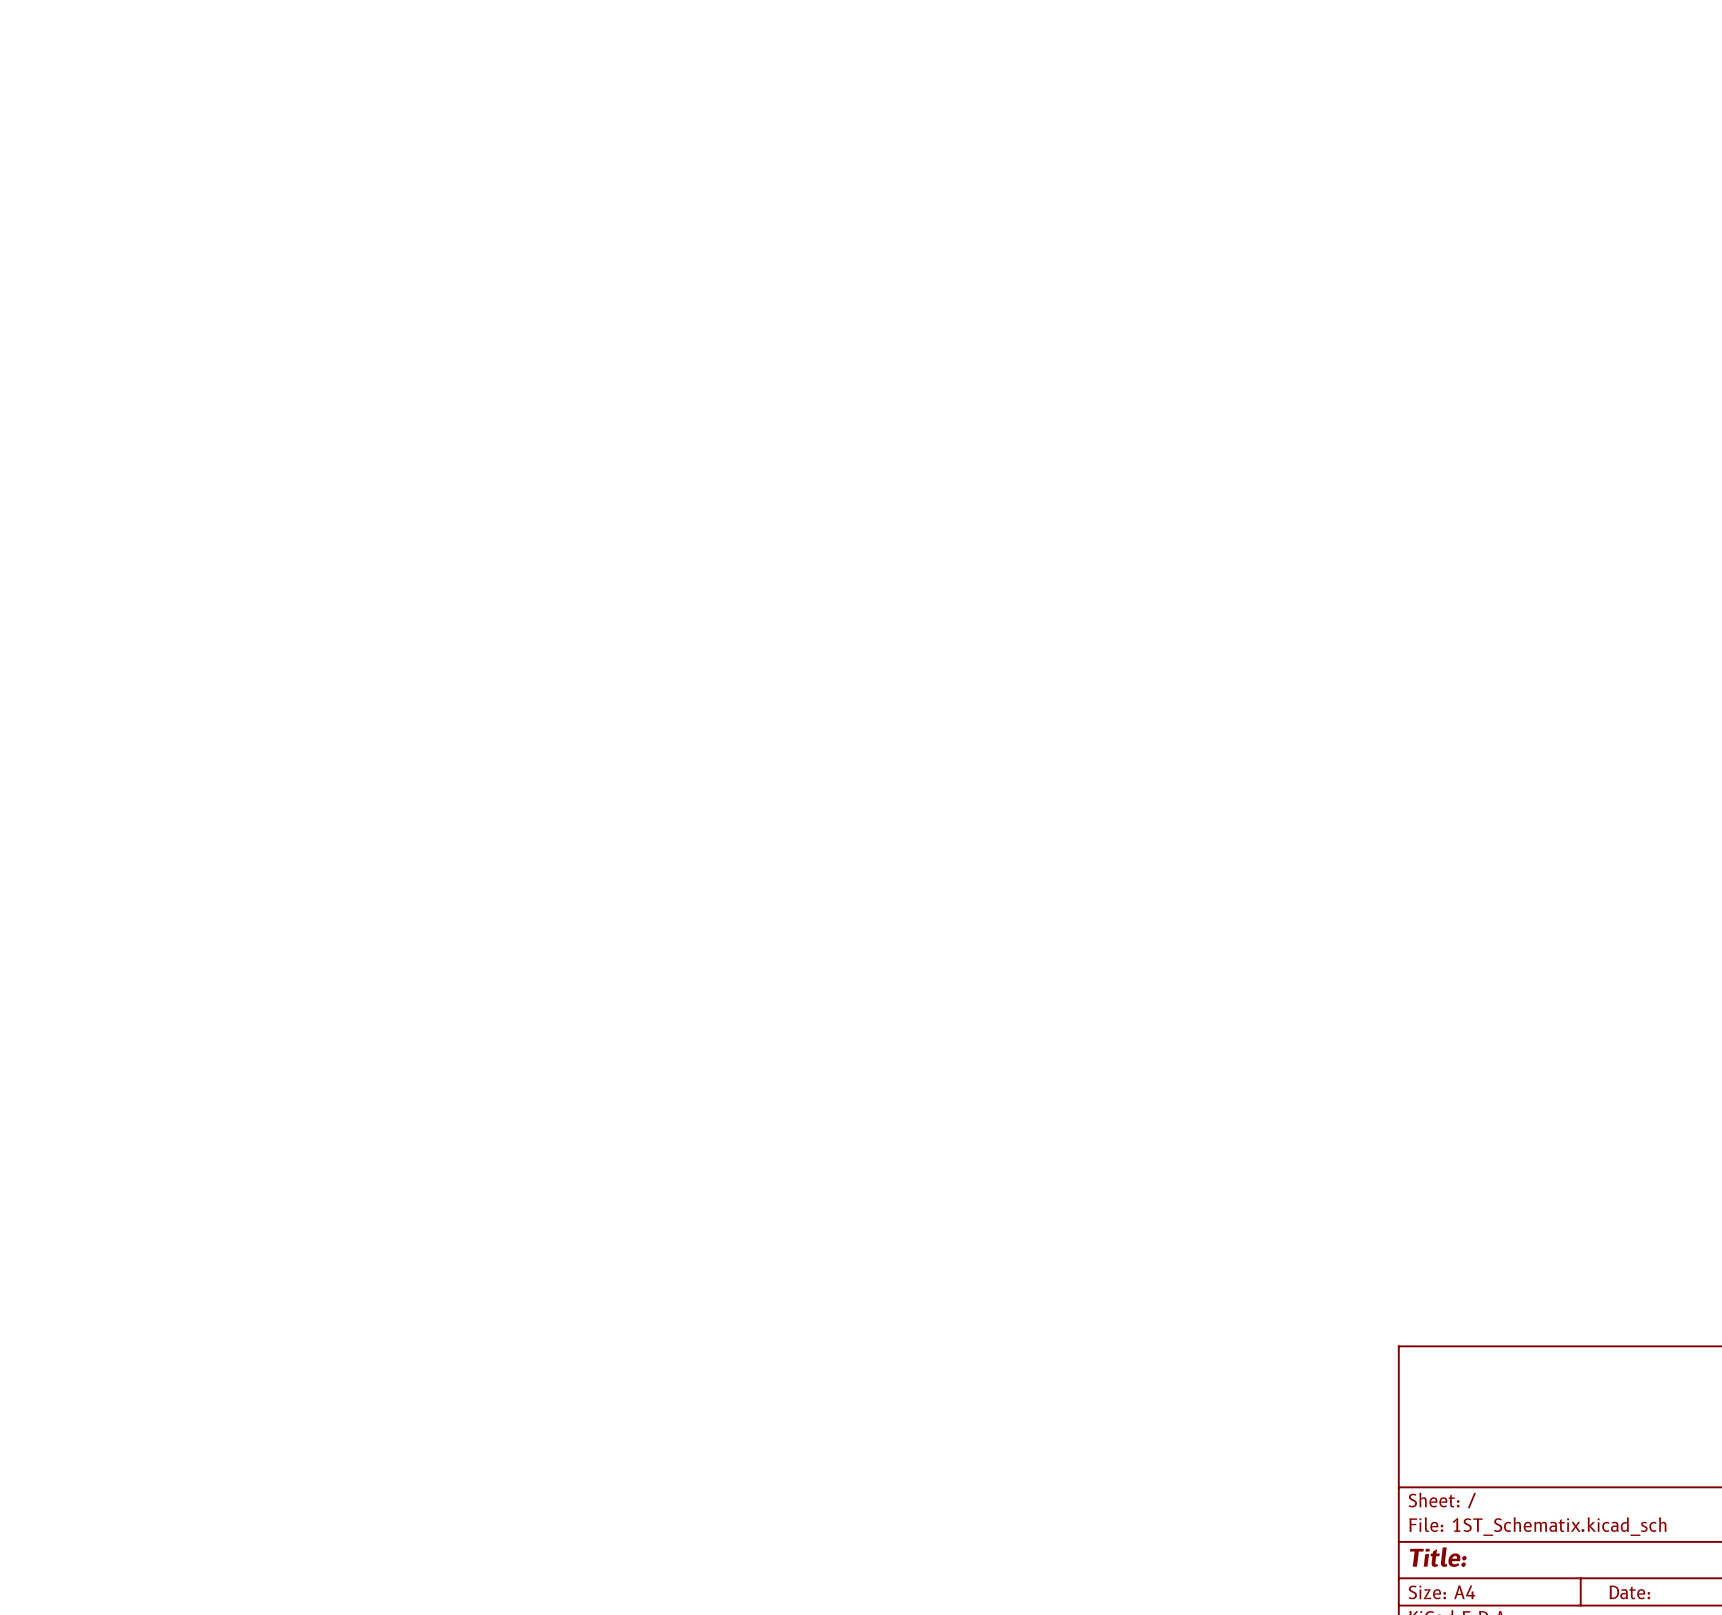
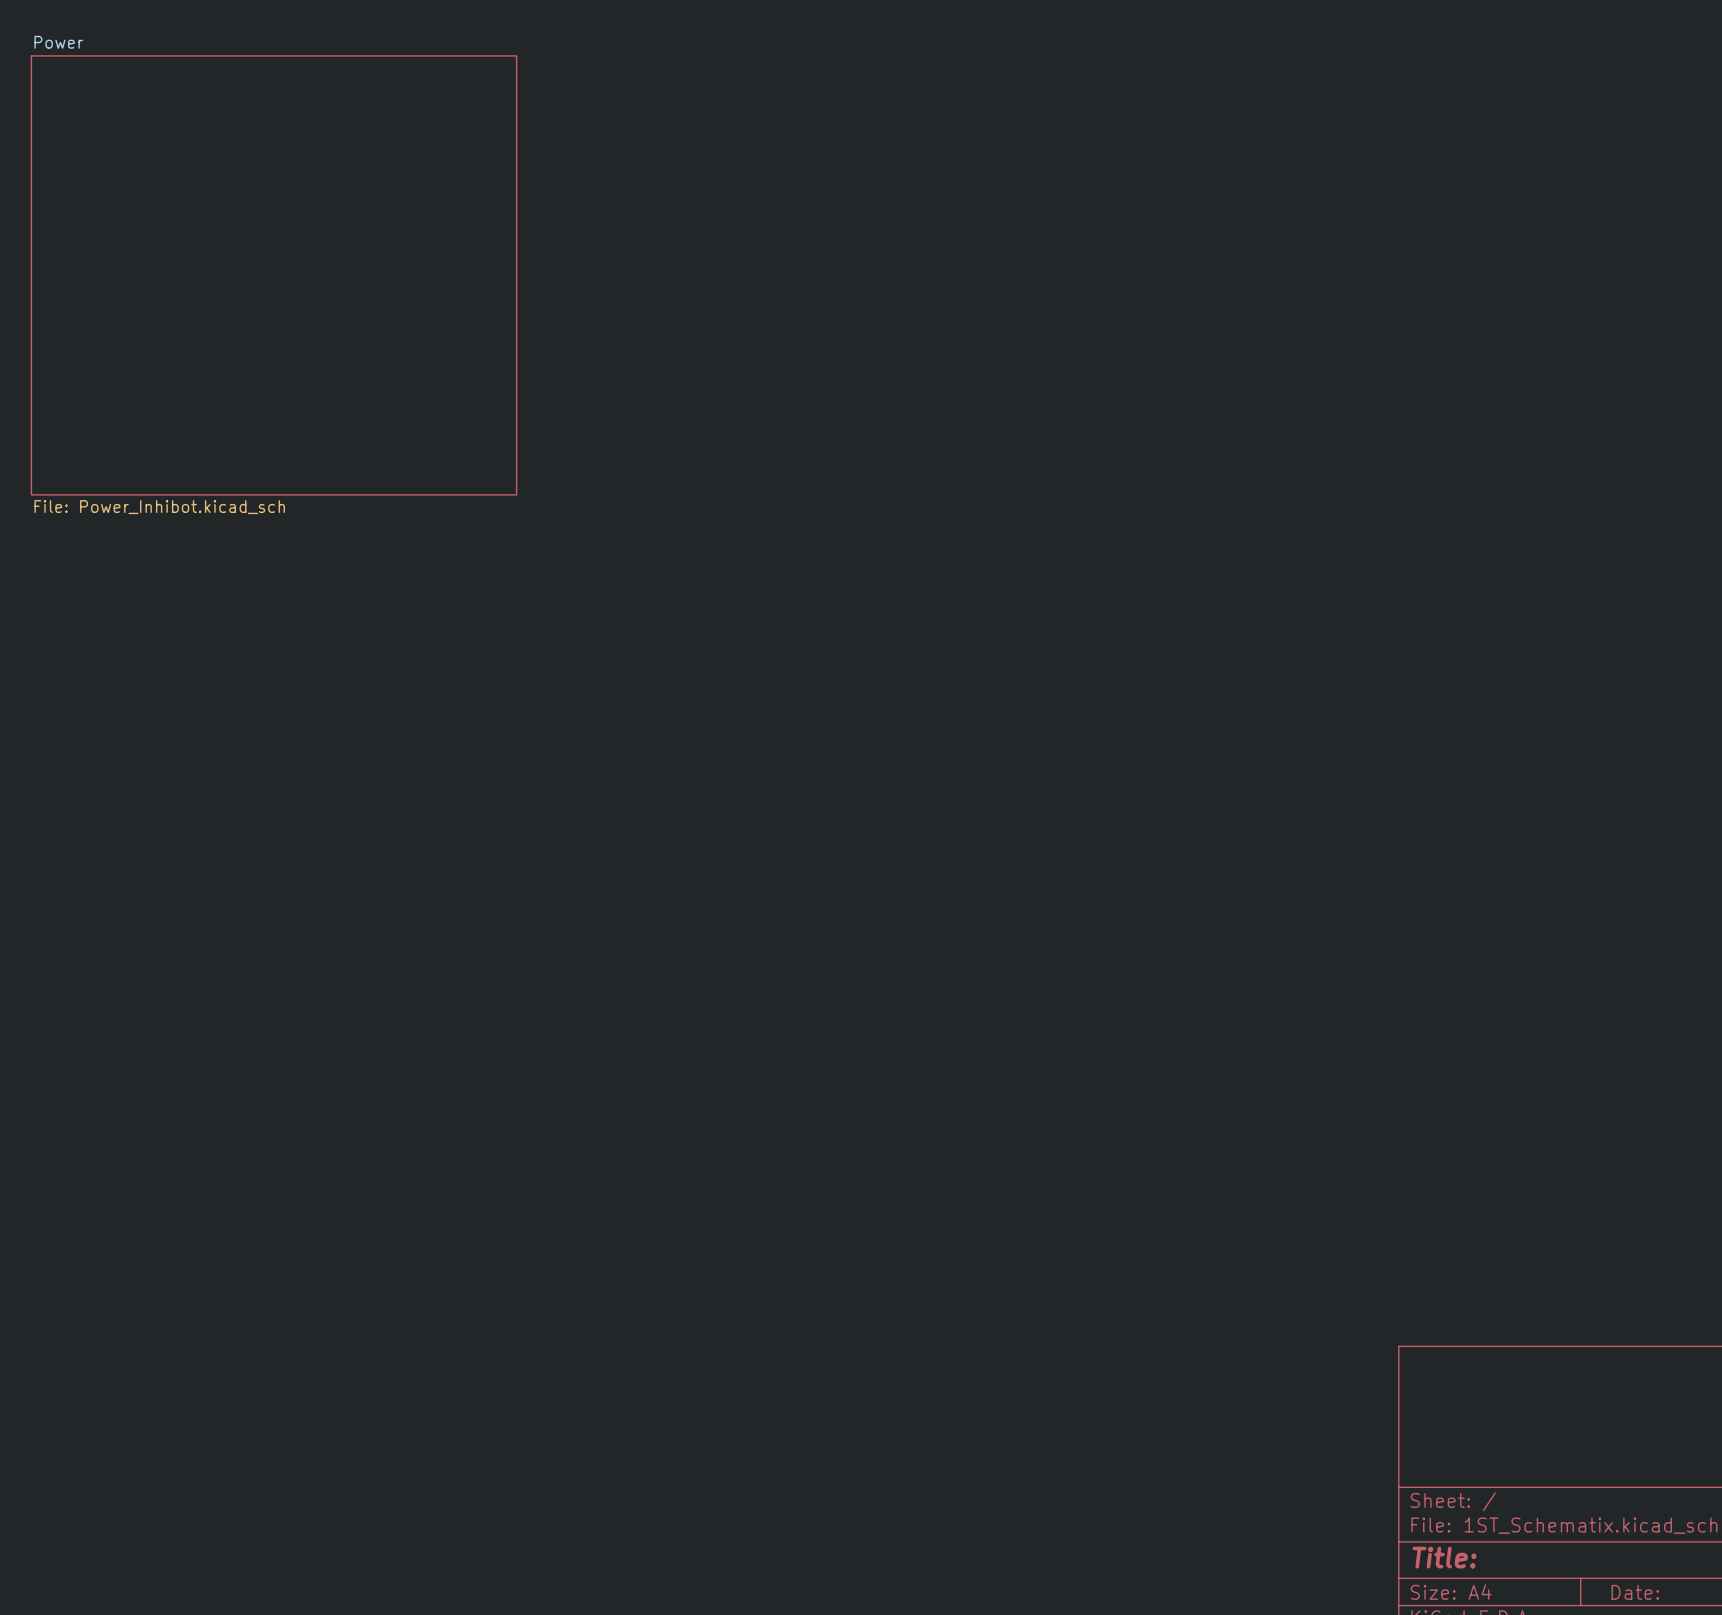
sheet Power: none -> File: Power_Inhibot.kicad_sch (274, 275)

